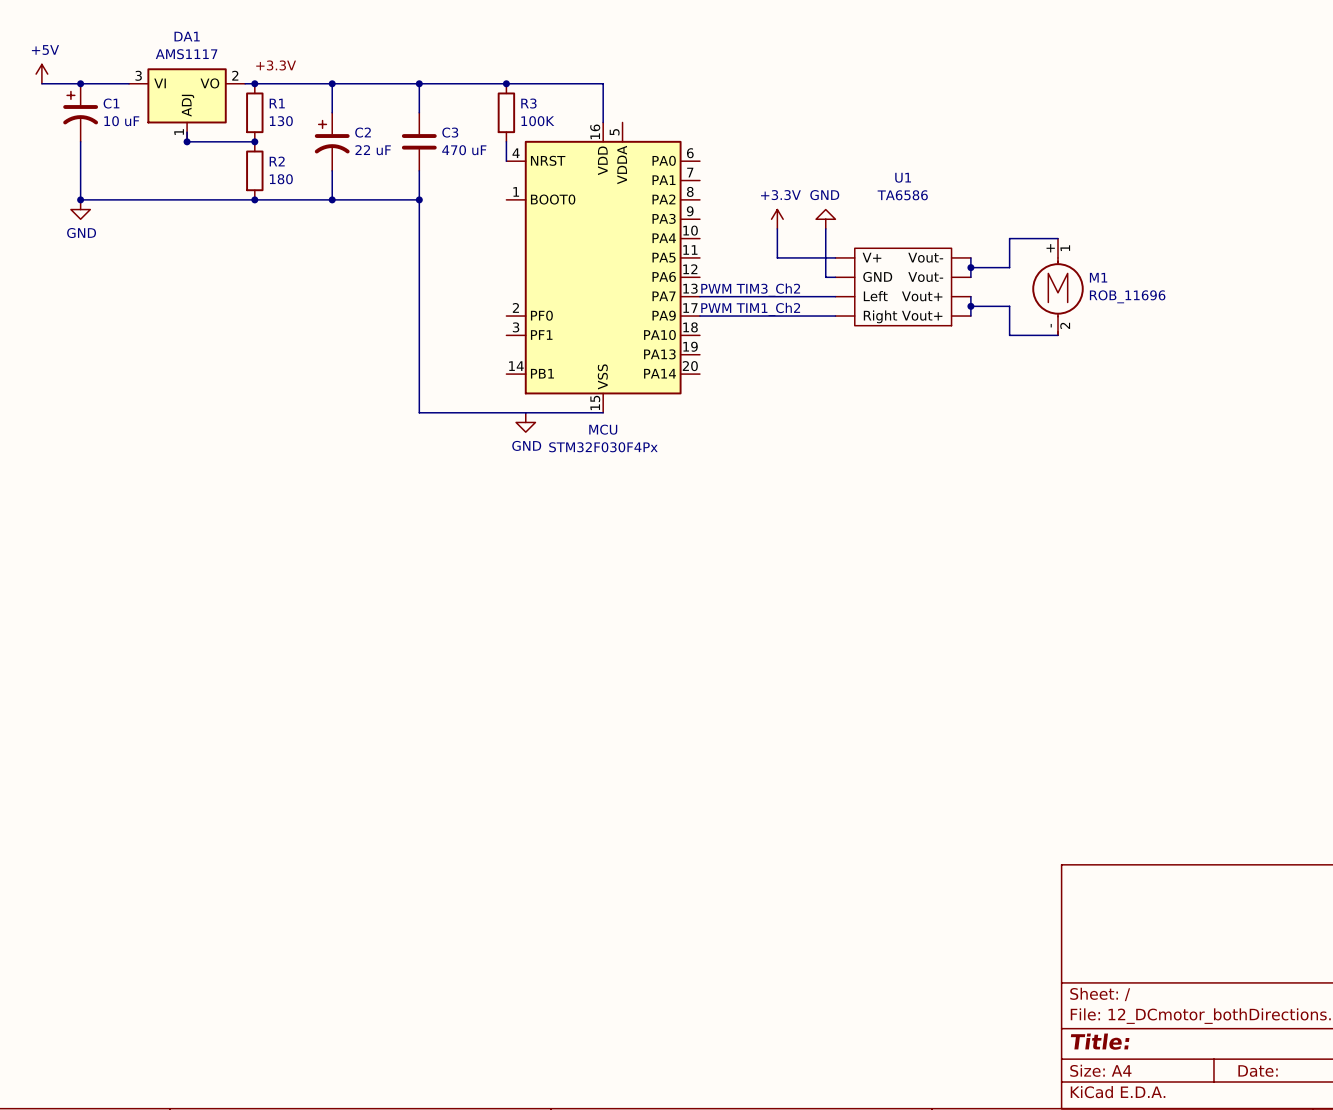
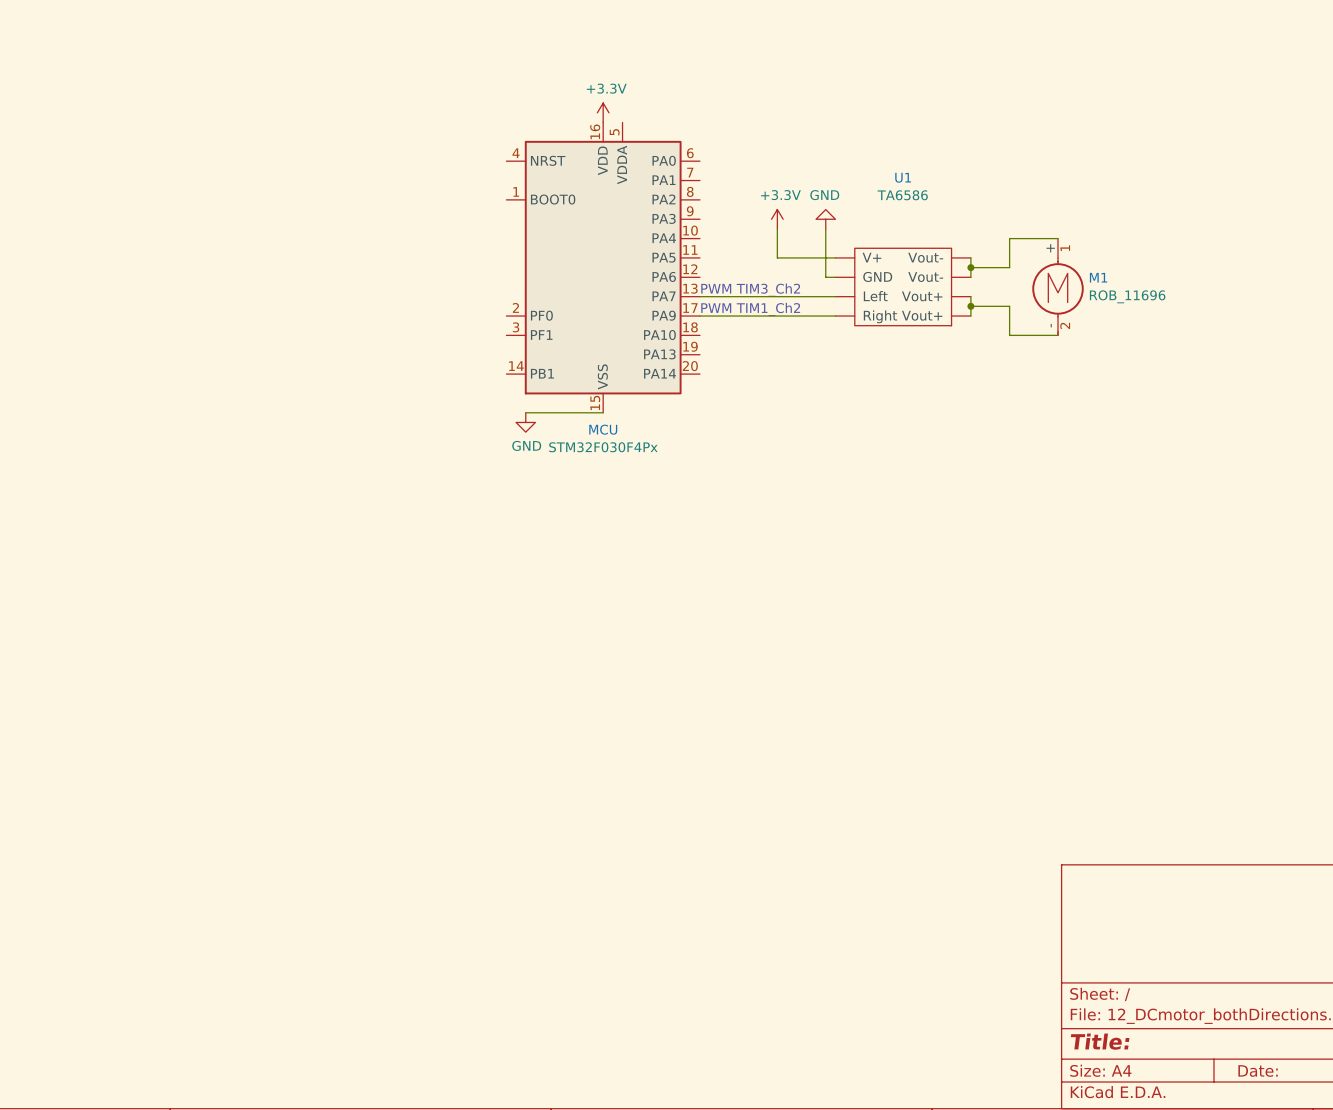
label: +3.3V (276, 65) -> none
power symbol: +5V (41, 74) -> none
wire: (41, 83) (129, 83) -> none
junction: (80, 83) -> none
wire: (245, 83) (603, 83) (603, 122) -> none
junction: (254, 83) -> none
wire: (332, 83) (332, 112) -> none
junction: (332, 83) -> none
wire: (419, 83) (419, 112) -> none
junction: (419, 83) -> none
junction: (506, 83) -> none
DA1: AMS1117 (187, 105) -> none
C1: 10 uF (80, 112) -> none
R1: 130 (254, 112) -> none
R3: 100K (506, 112) -> none
power symbol: none -> +3.3V (603, 112)
wire: (187, 132) (187, 141) (254, 141) -> none
wire: (80, 141) (80, 199) (419, 199) -> none
junction: (187, 141) -> none
junction: (254, 141) -> none
C2: 22 uF (332, 141) -> none
C3: 470 uF (419, 141) -> none
wire: (506, 141) (506, 161) -> none
R2: 180 (254, 170) -> none
wire: (332, 170) (332, 199) -> none
wire: (419, 170) (419, 412) (525, 412) -> none
junction: (80, 199) -> none
junction: (254, 199) -> none
junction: (332, 199) -> none
junction: (419, 199) -> none
power symbol: GND (80, 209) -> none

